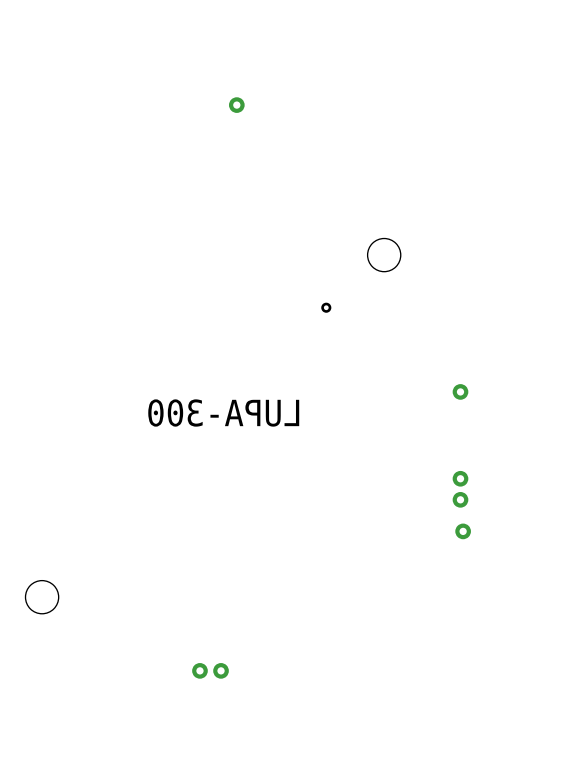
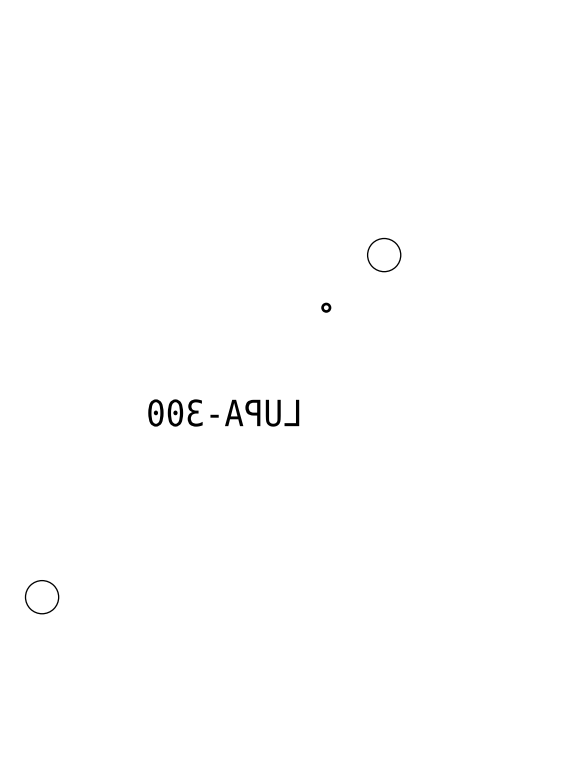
via: (236, 105) -> none
via: (460, 391) -> none
via: (460, 478) -> none
via: (460, 499) -> none
via: (463, 531) -> none
via: (199, 670) -> none
via: (221, 670) -> none

